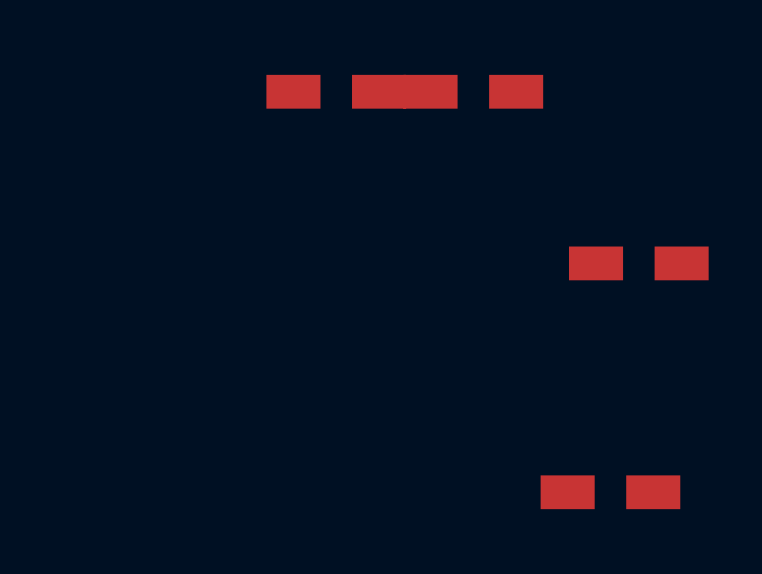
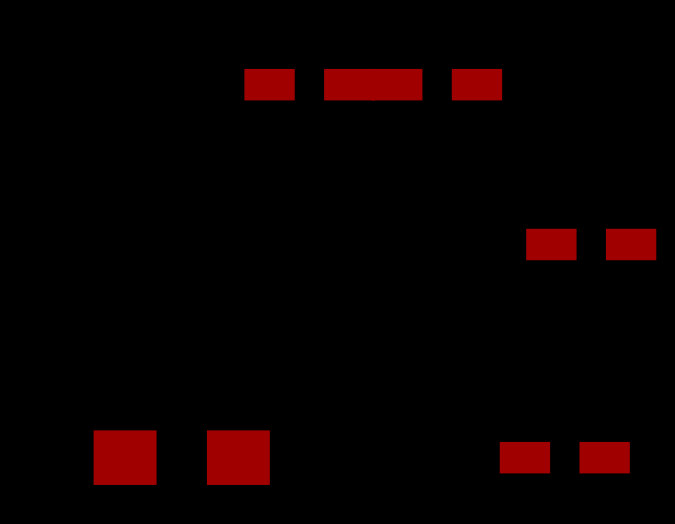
part: none -> (181, 457)

